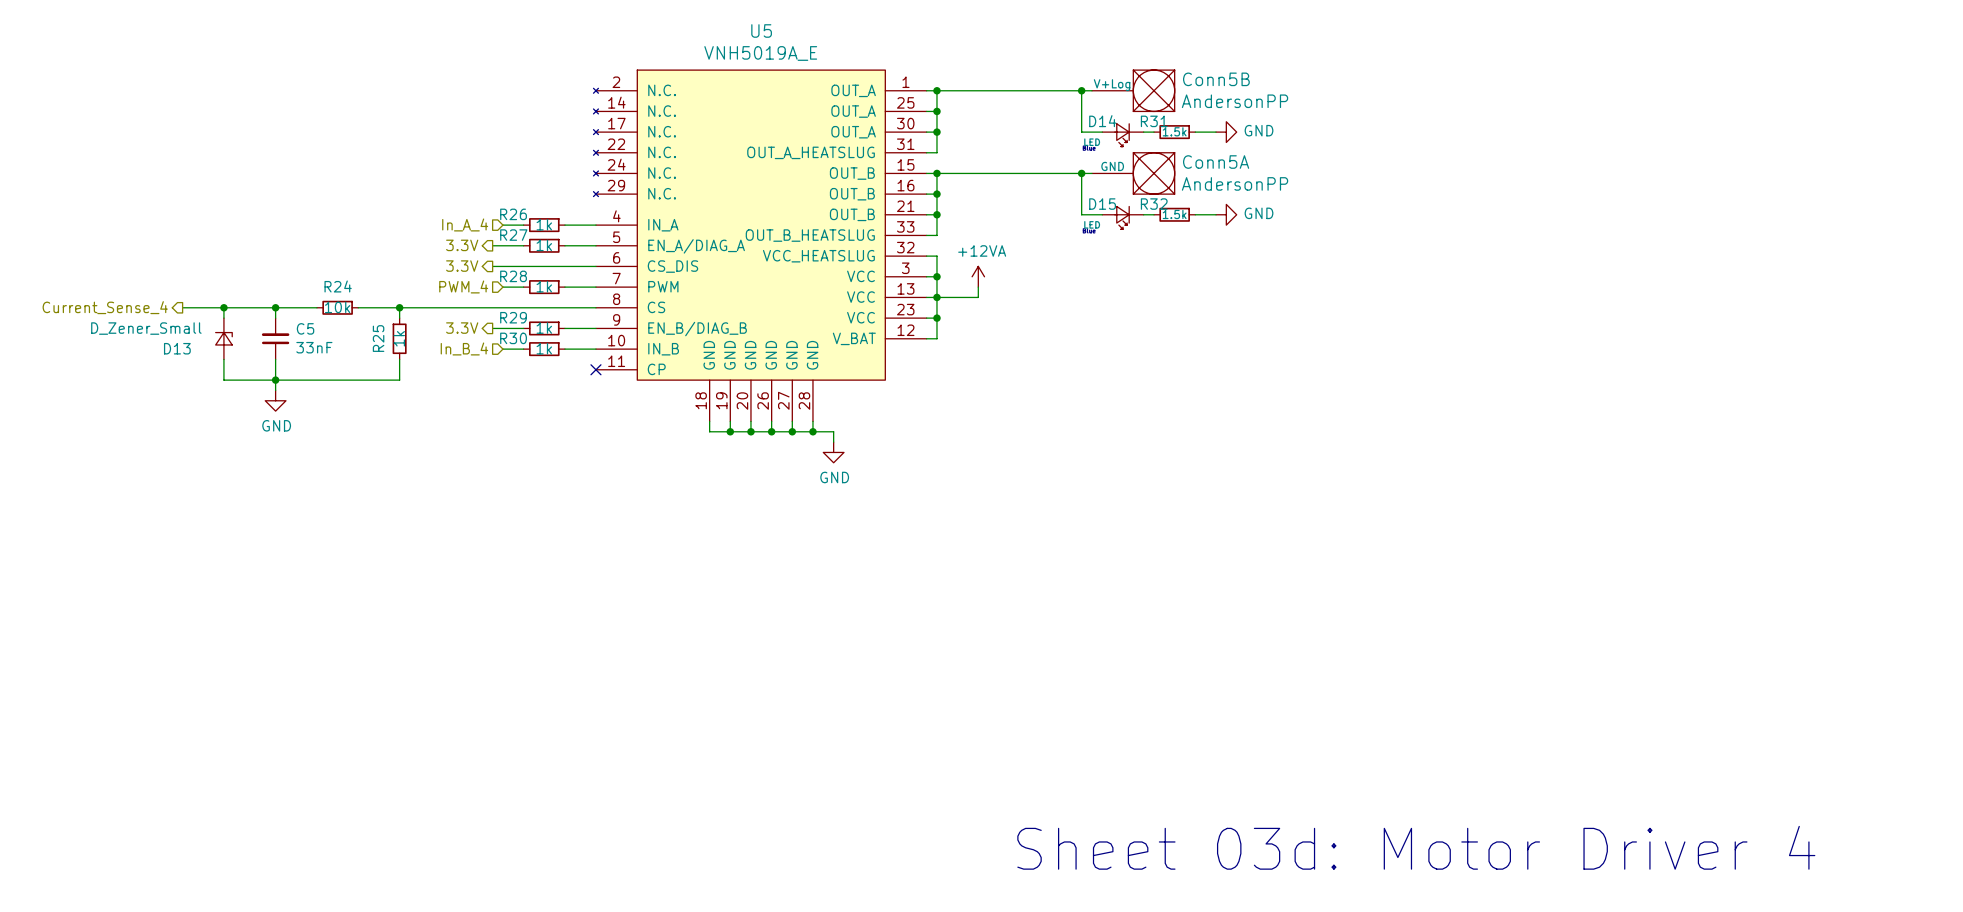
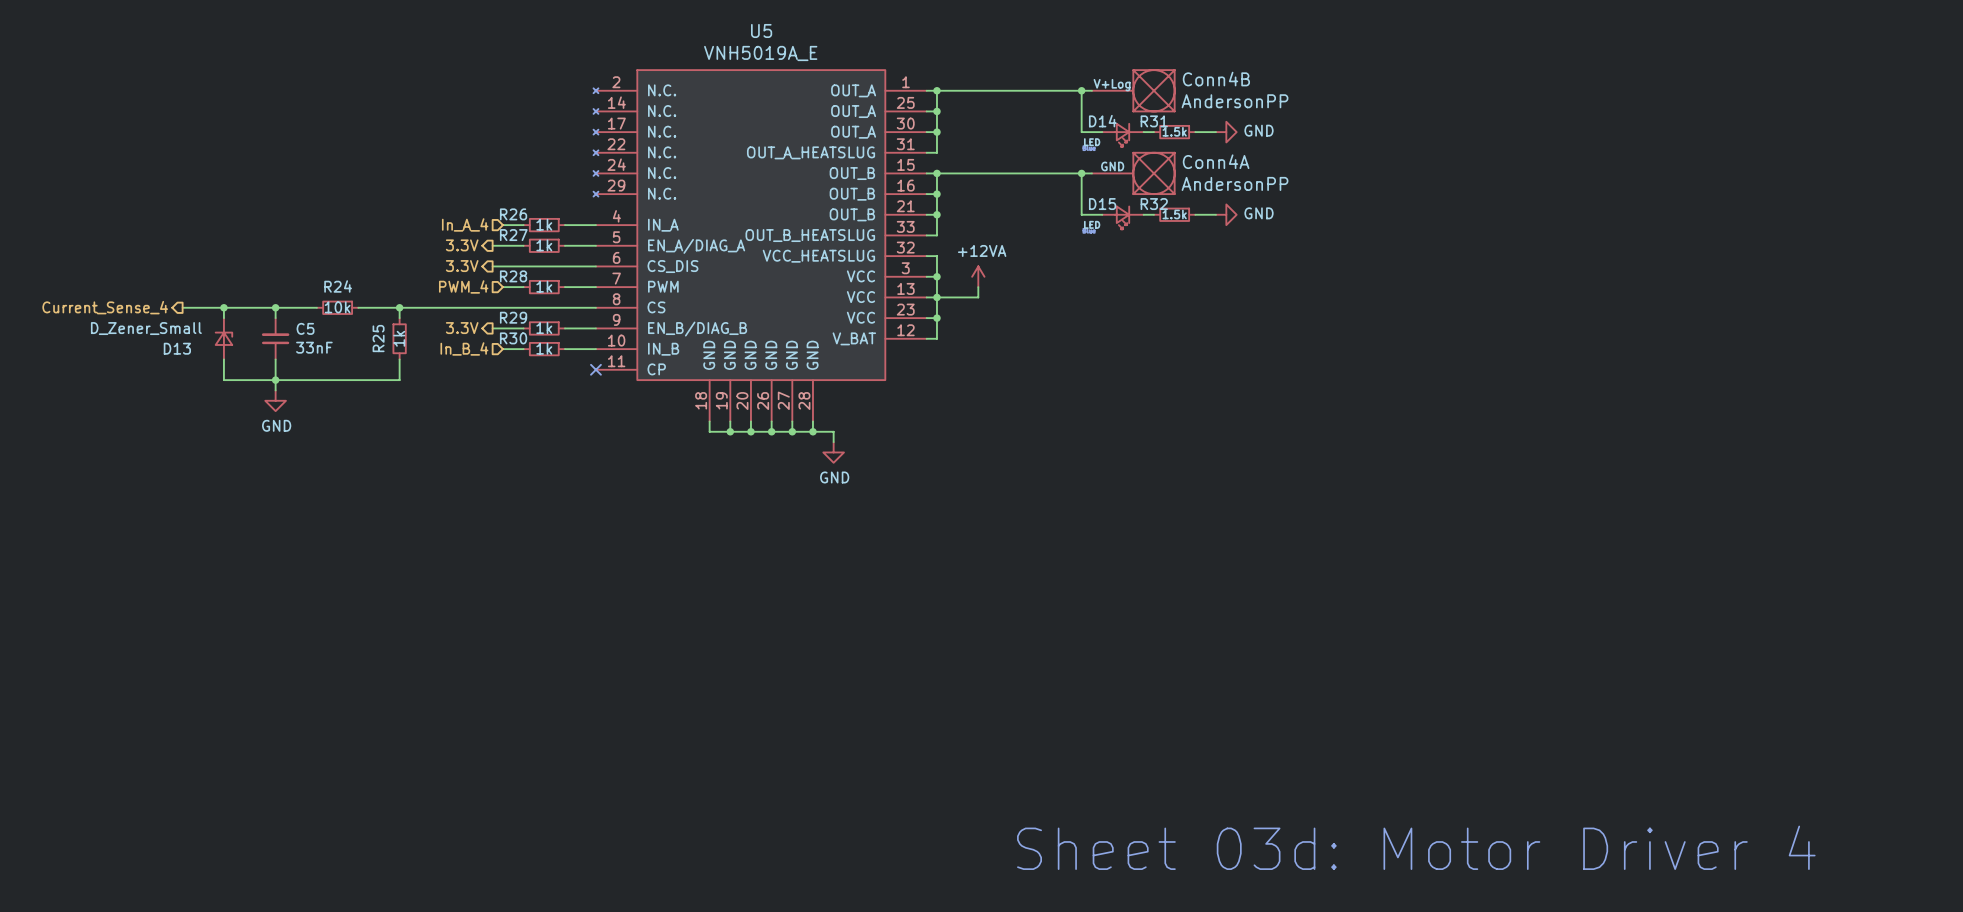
Conn5B name: Conn5B (1216, 79) -> Conn4B (1216, 79)
Conn5A name: Conn5A (1216, 162) -> Conn4A (1216, 161)

